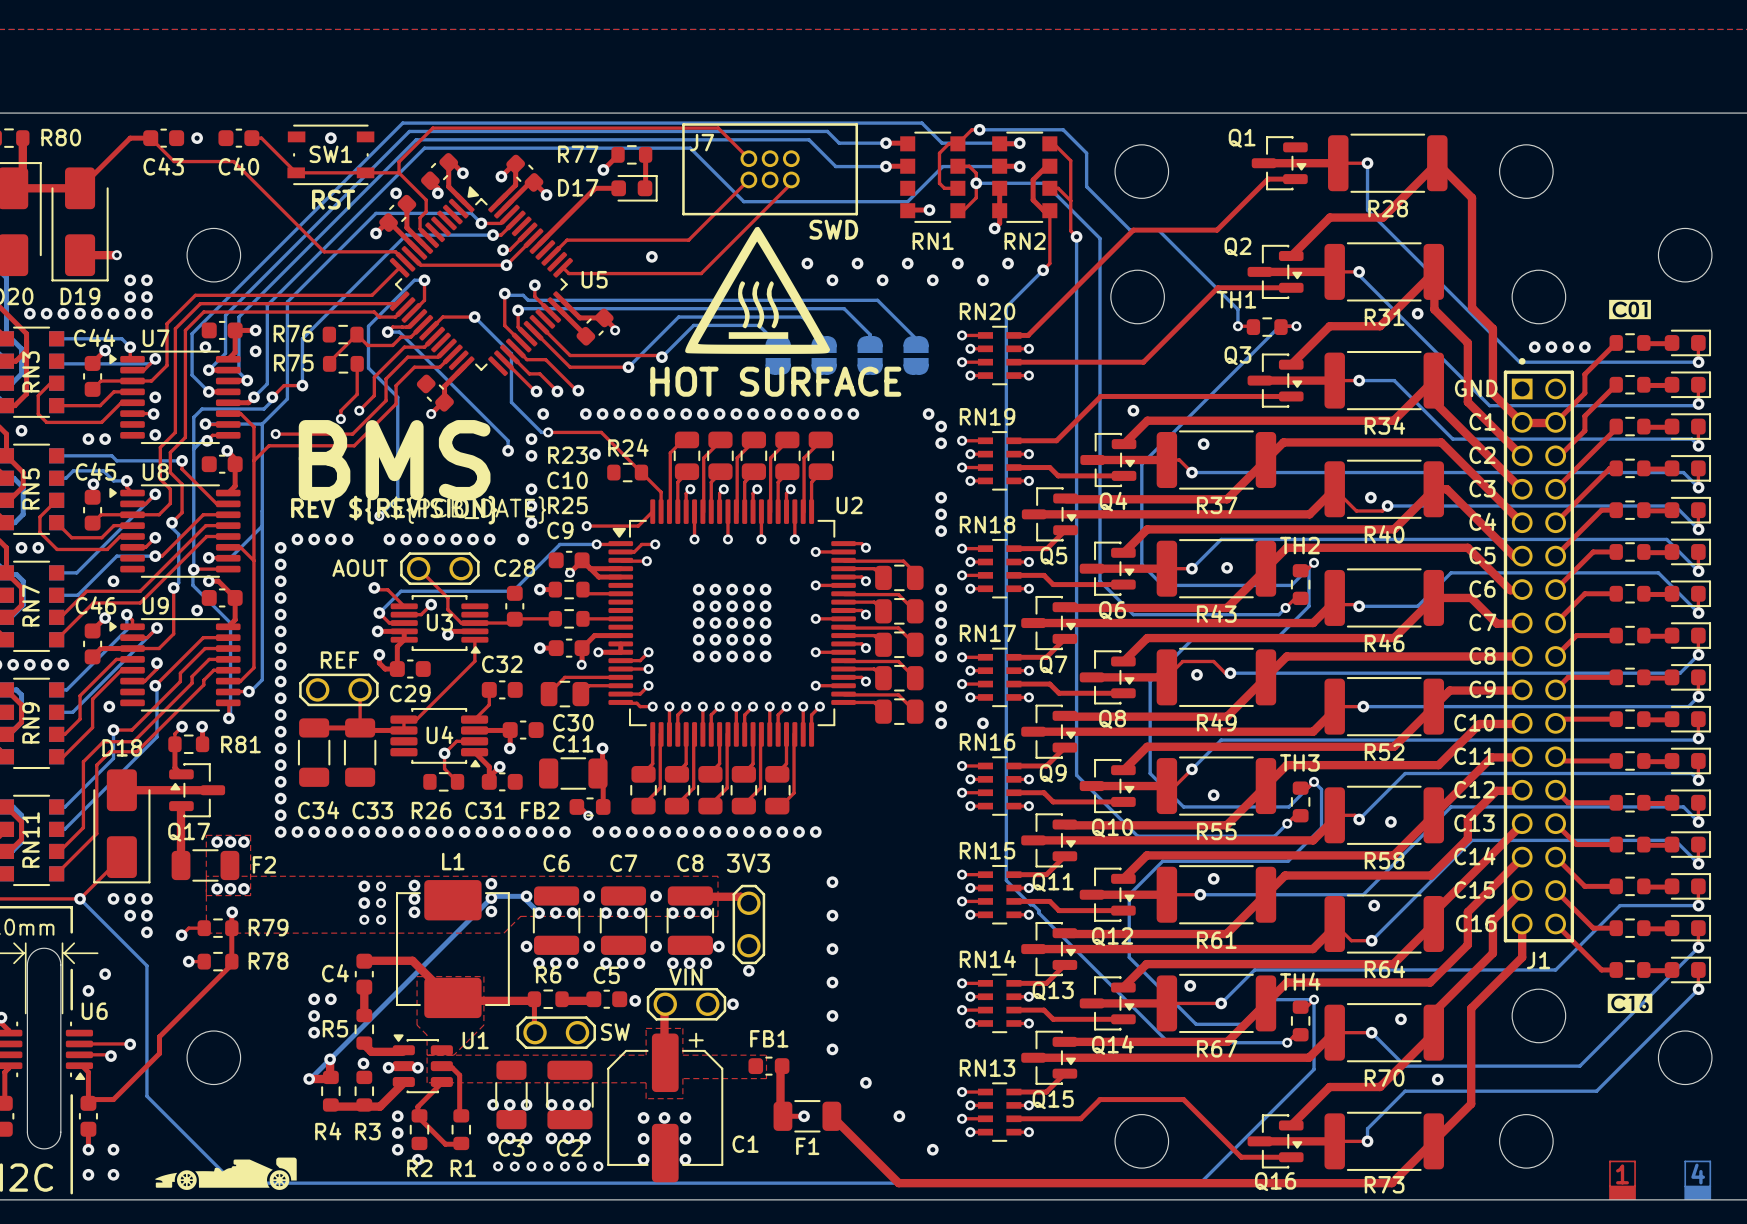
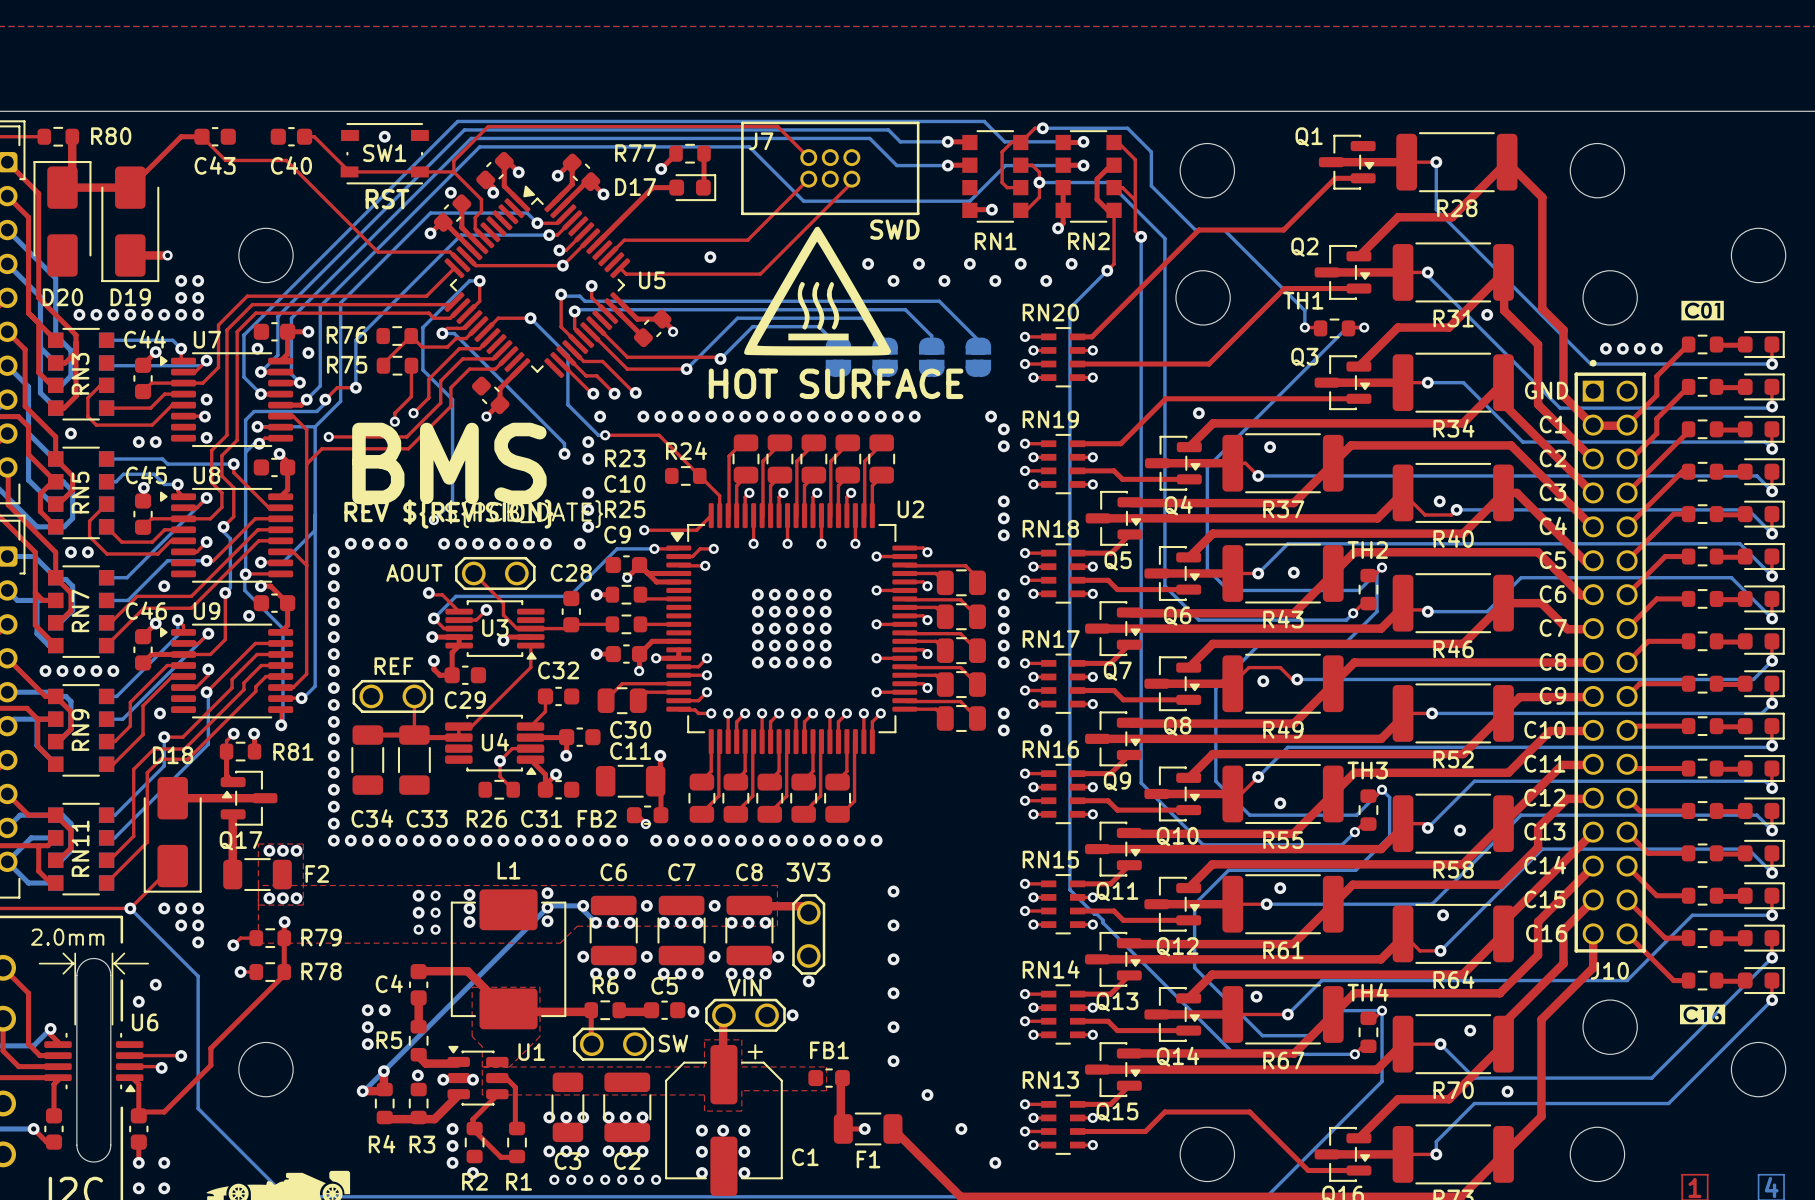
via: (197, 138) -> none
via: (595, 454) -> none
J1 name: J1 (1538, 960) -> J10 (1609, 970)

